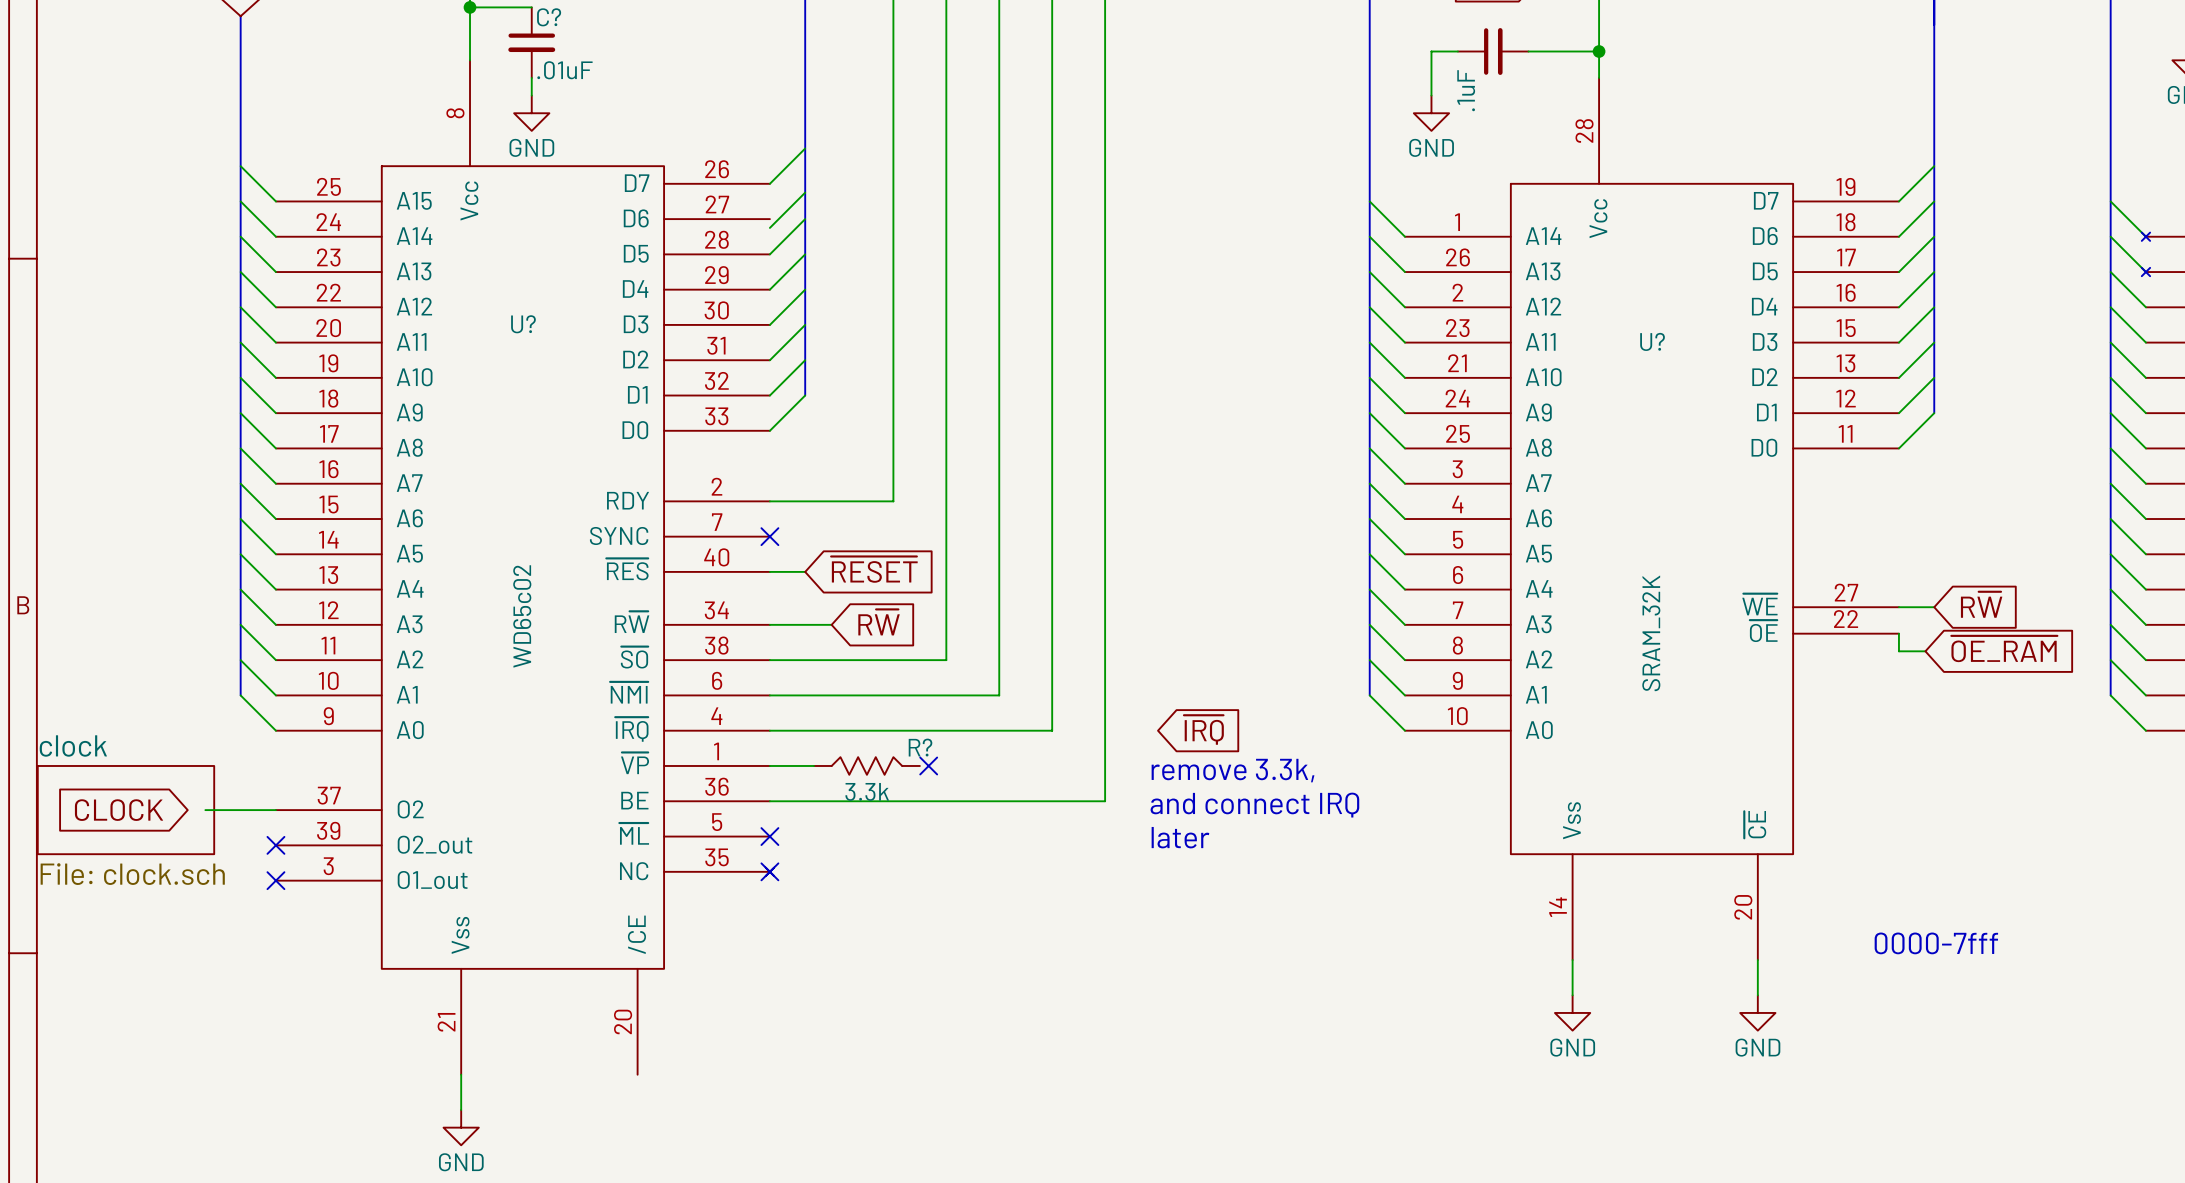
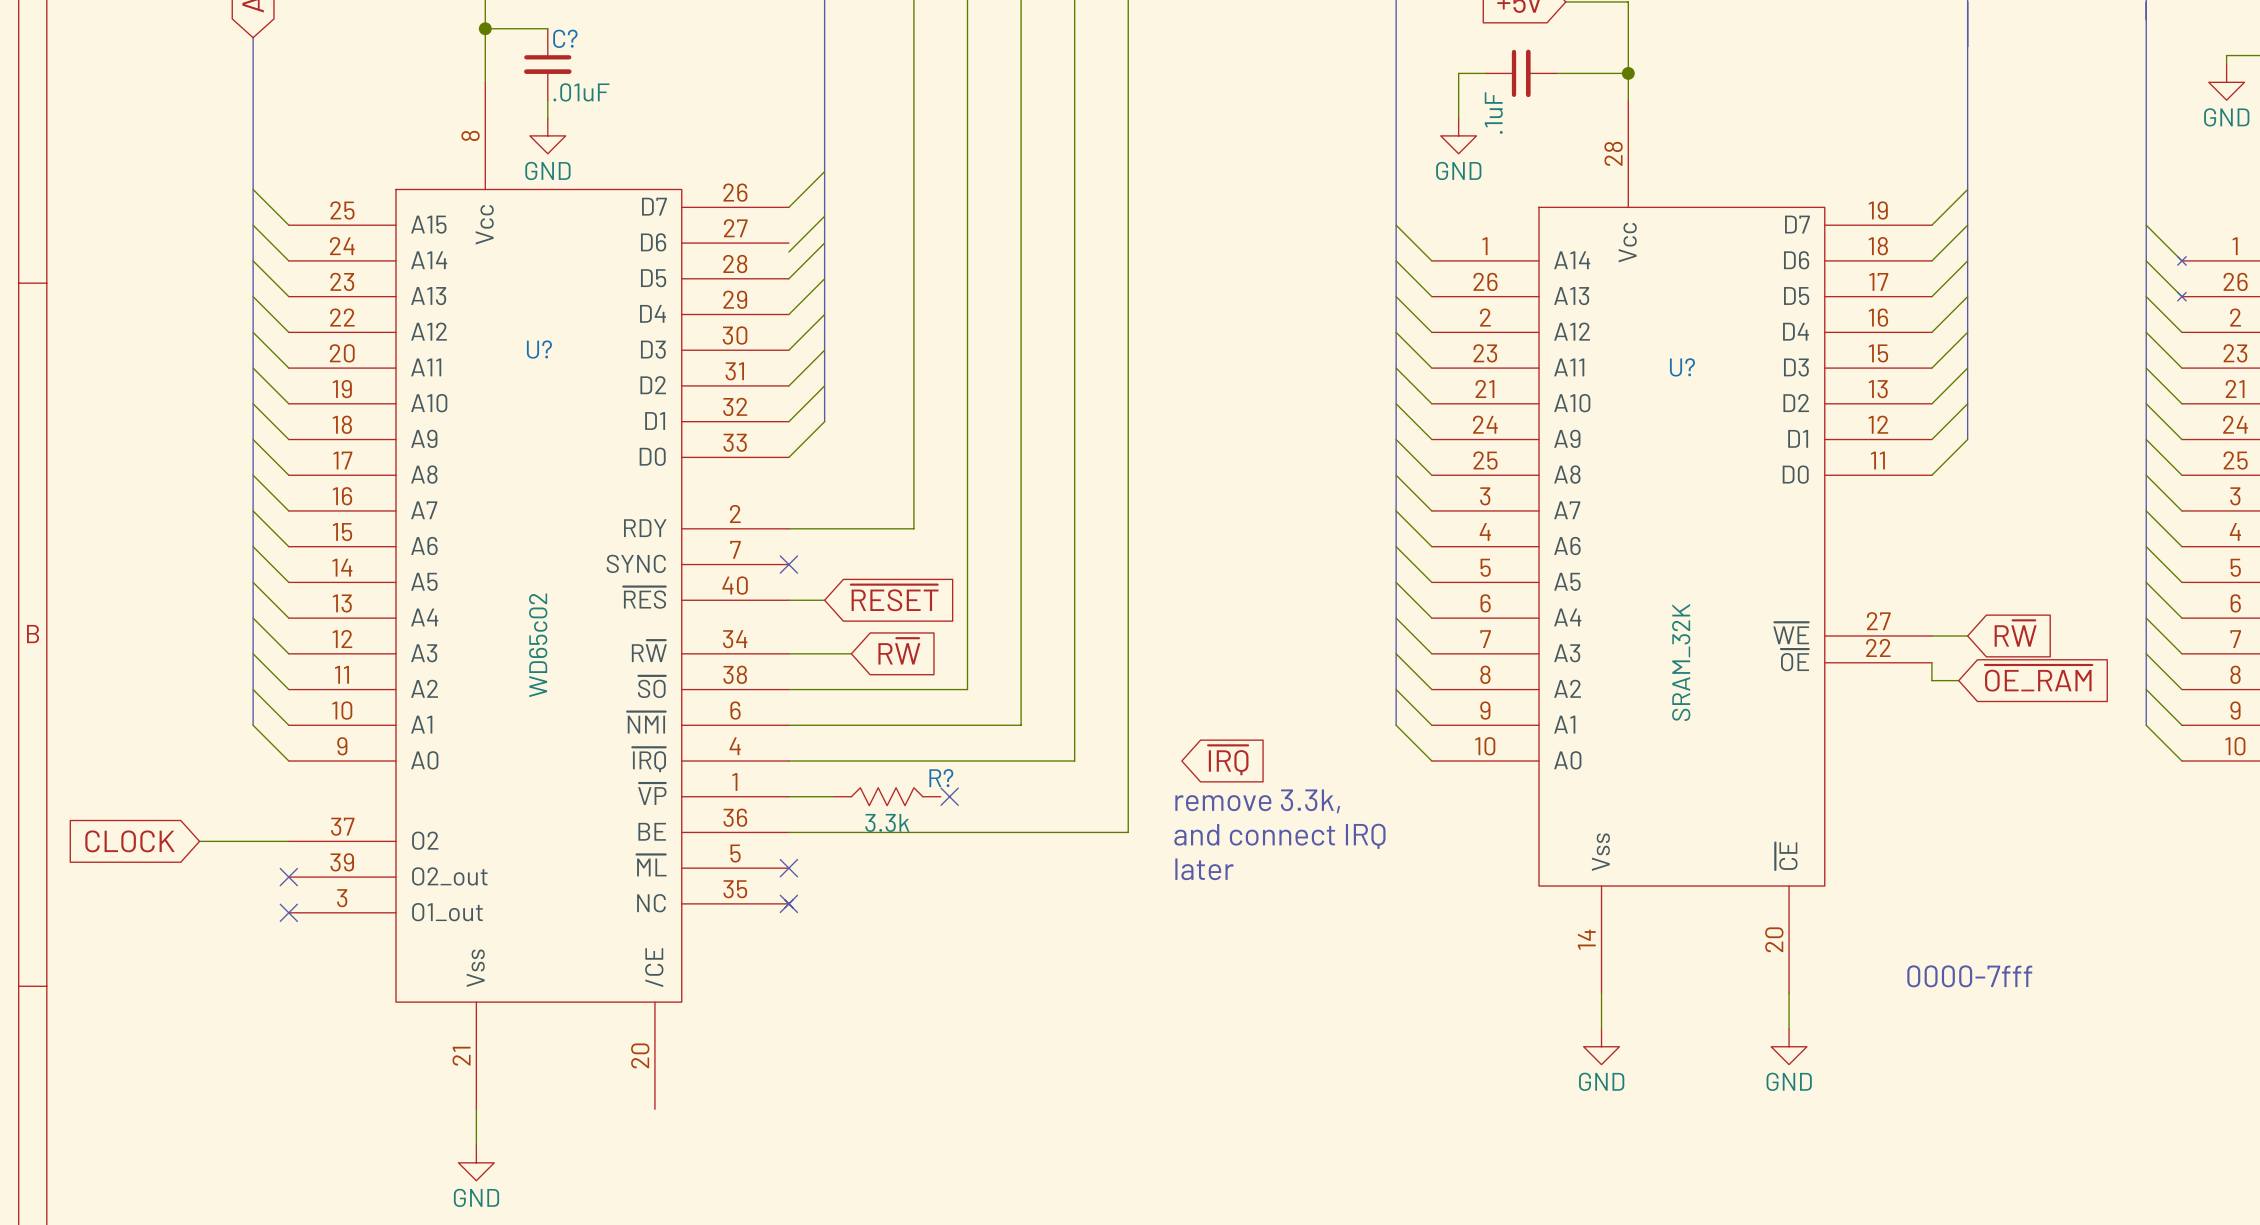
sheet clock: File: clock.sch (125, 810) -> none
wire: none -> (199, 841) (217, 841)

